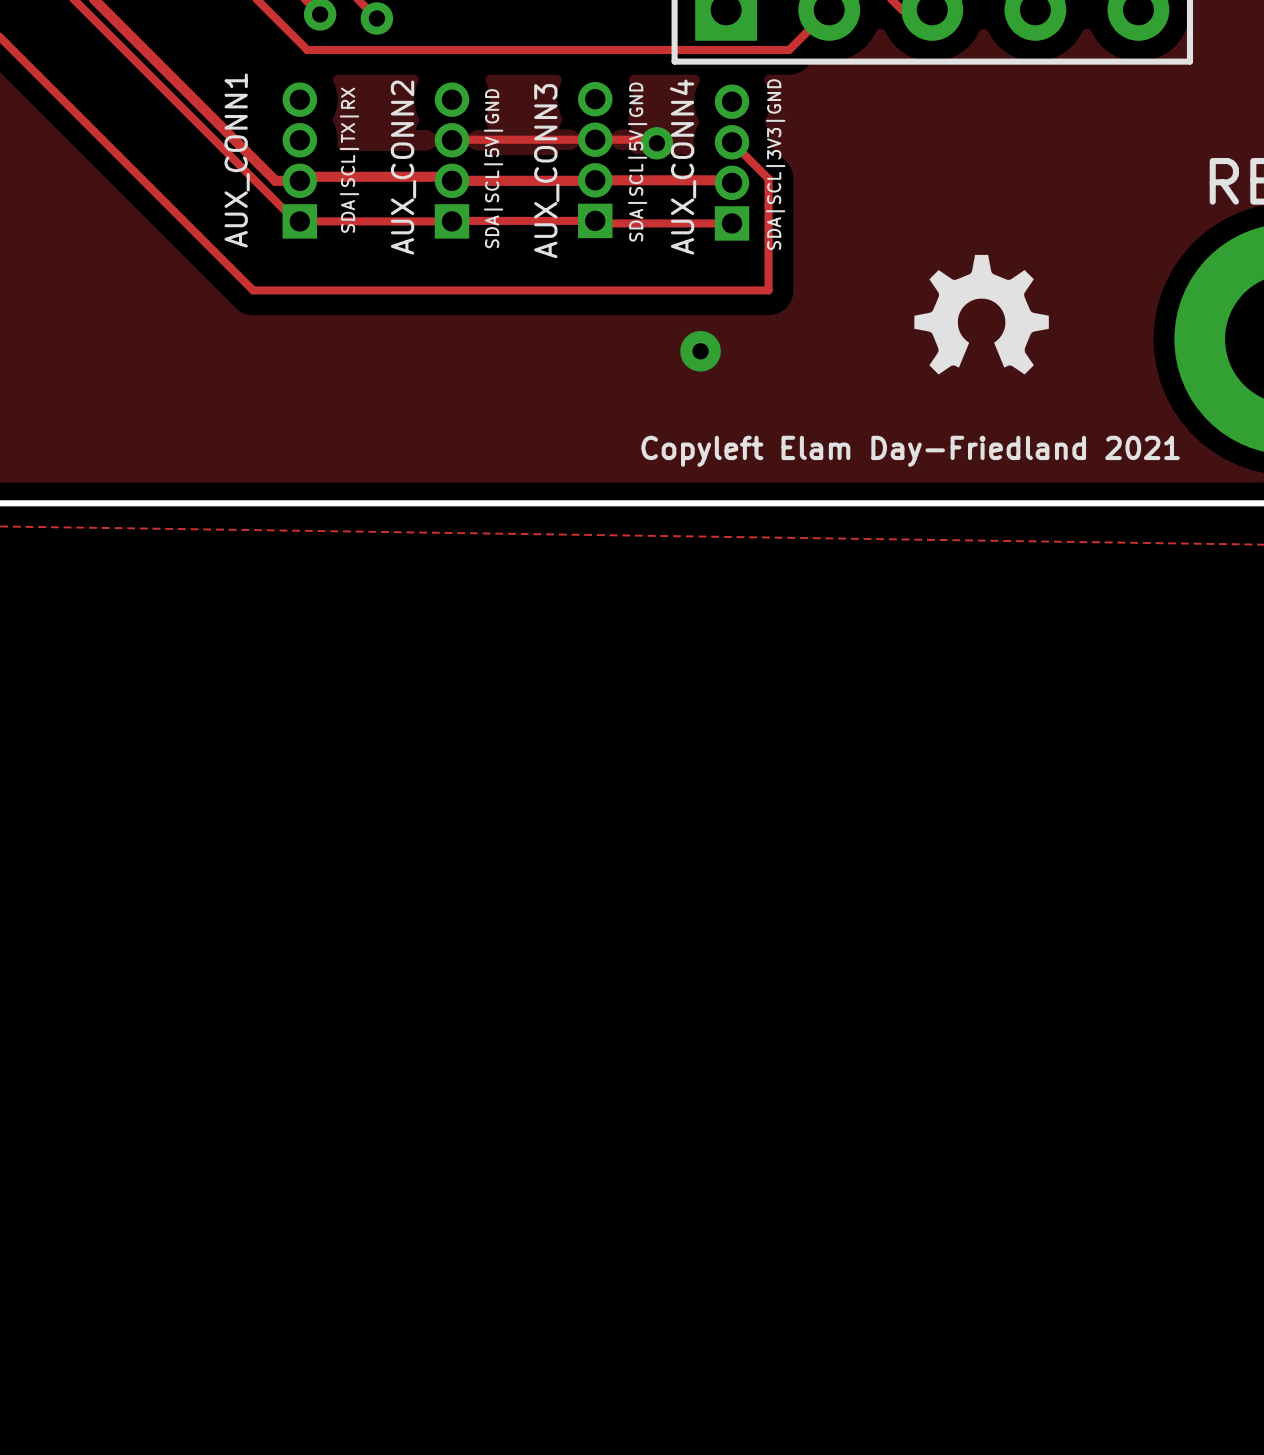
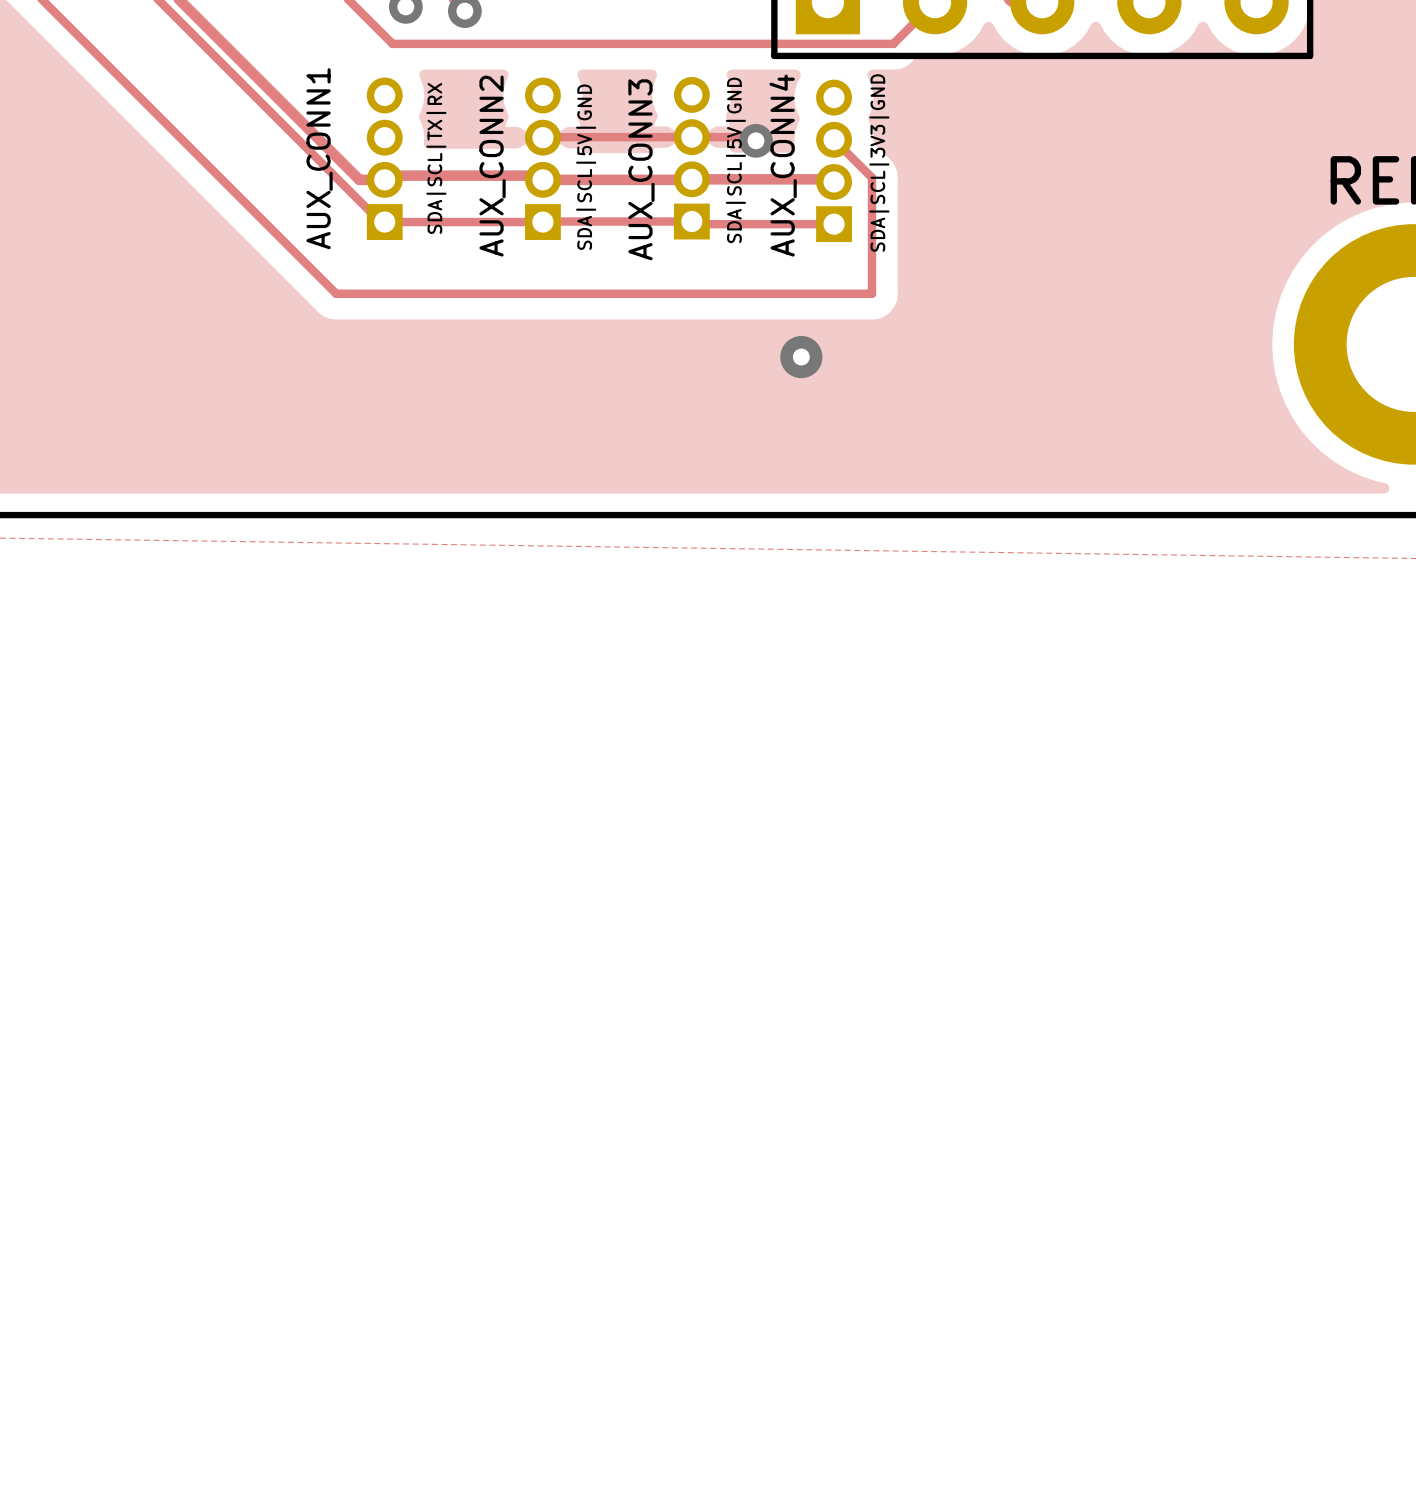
drawing: [914, 254, 1049, 375] -> none
text: Copyleft Elam Day-Friedland 2021 (910, 451) -> none

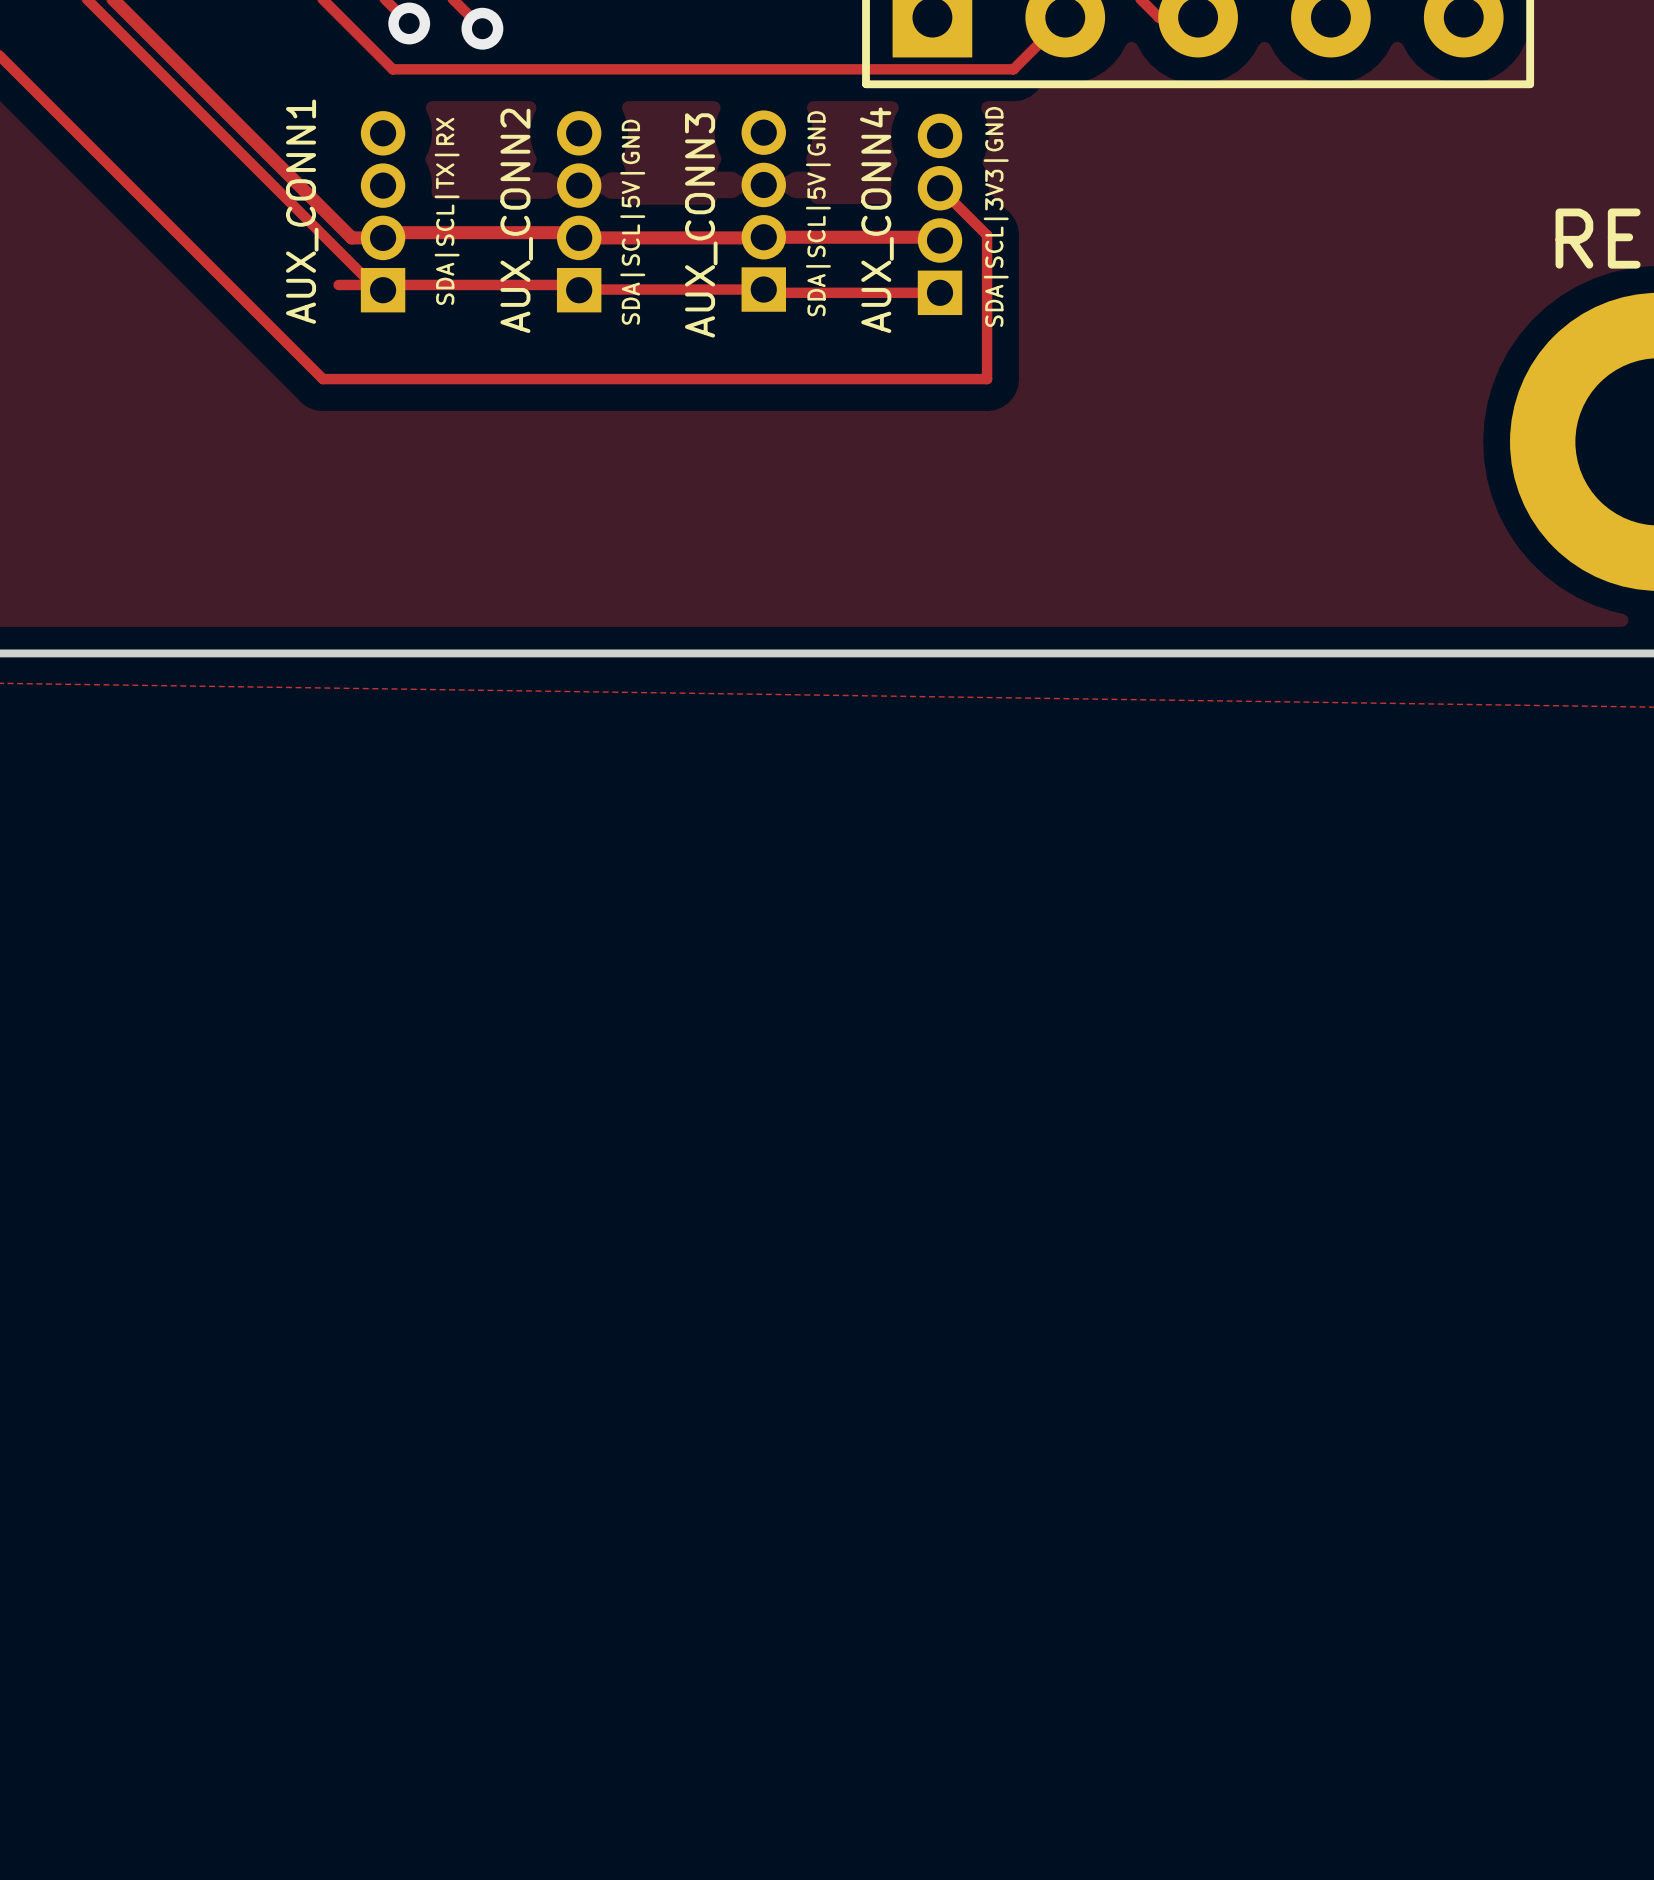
track: (543, 137) (752, 137) (755, 140) -> none
via: (755, 140) -> none
track: (384, 222) (542, 222) -> (338, 284) (573, 284) (579, 290)
via: (801, 357) -> none

